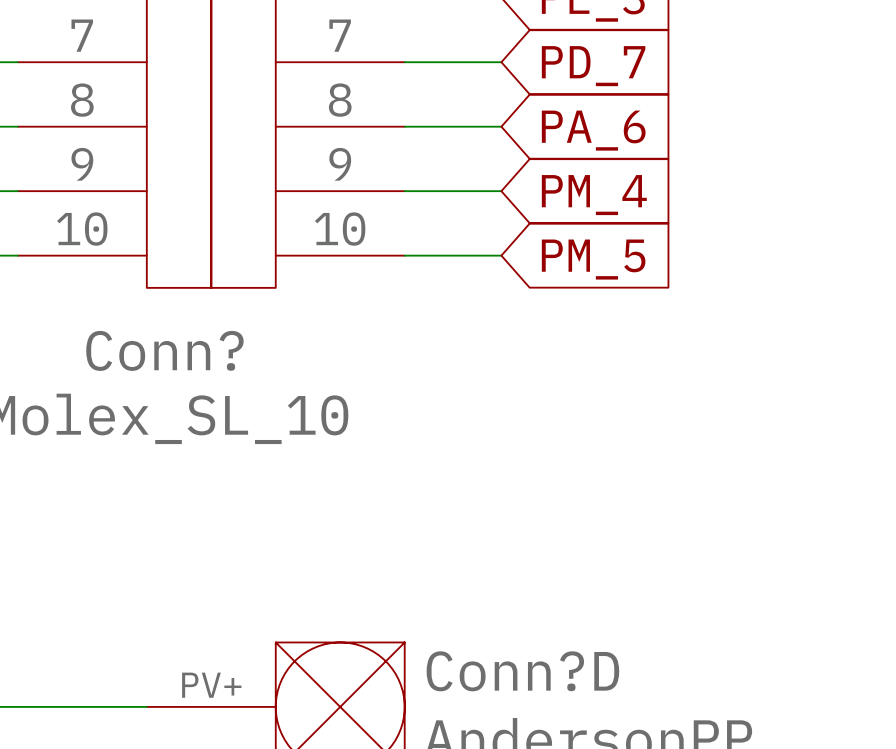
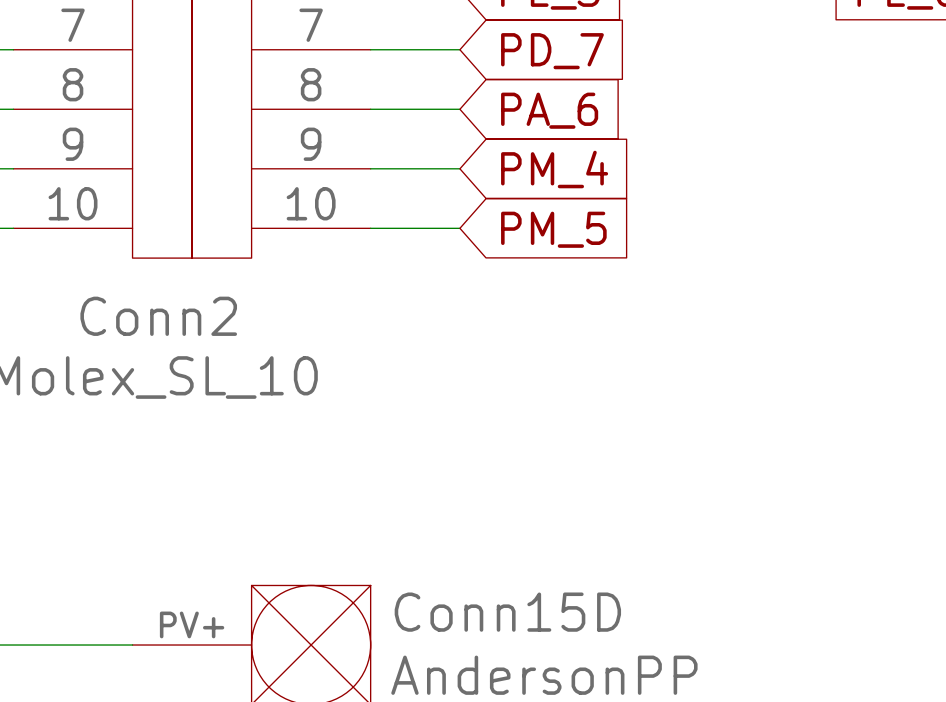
Conn? name: Conn? (164, 350) -> Conn2 (158, 316)
Conn?D name: Conn?D (522, 671) -> Conn15D (507, 612)

